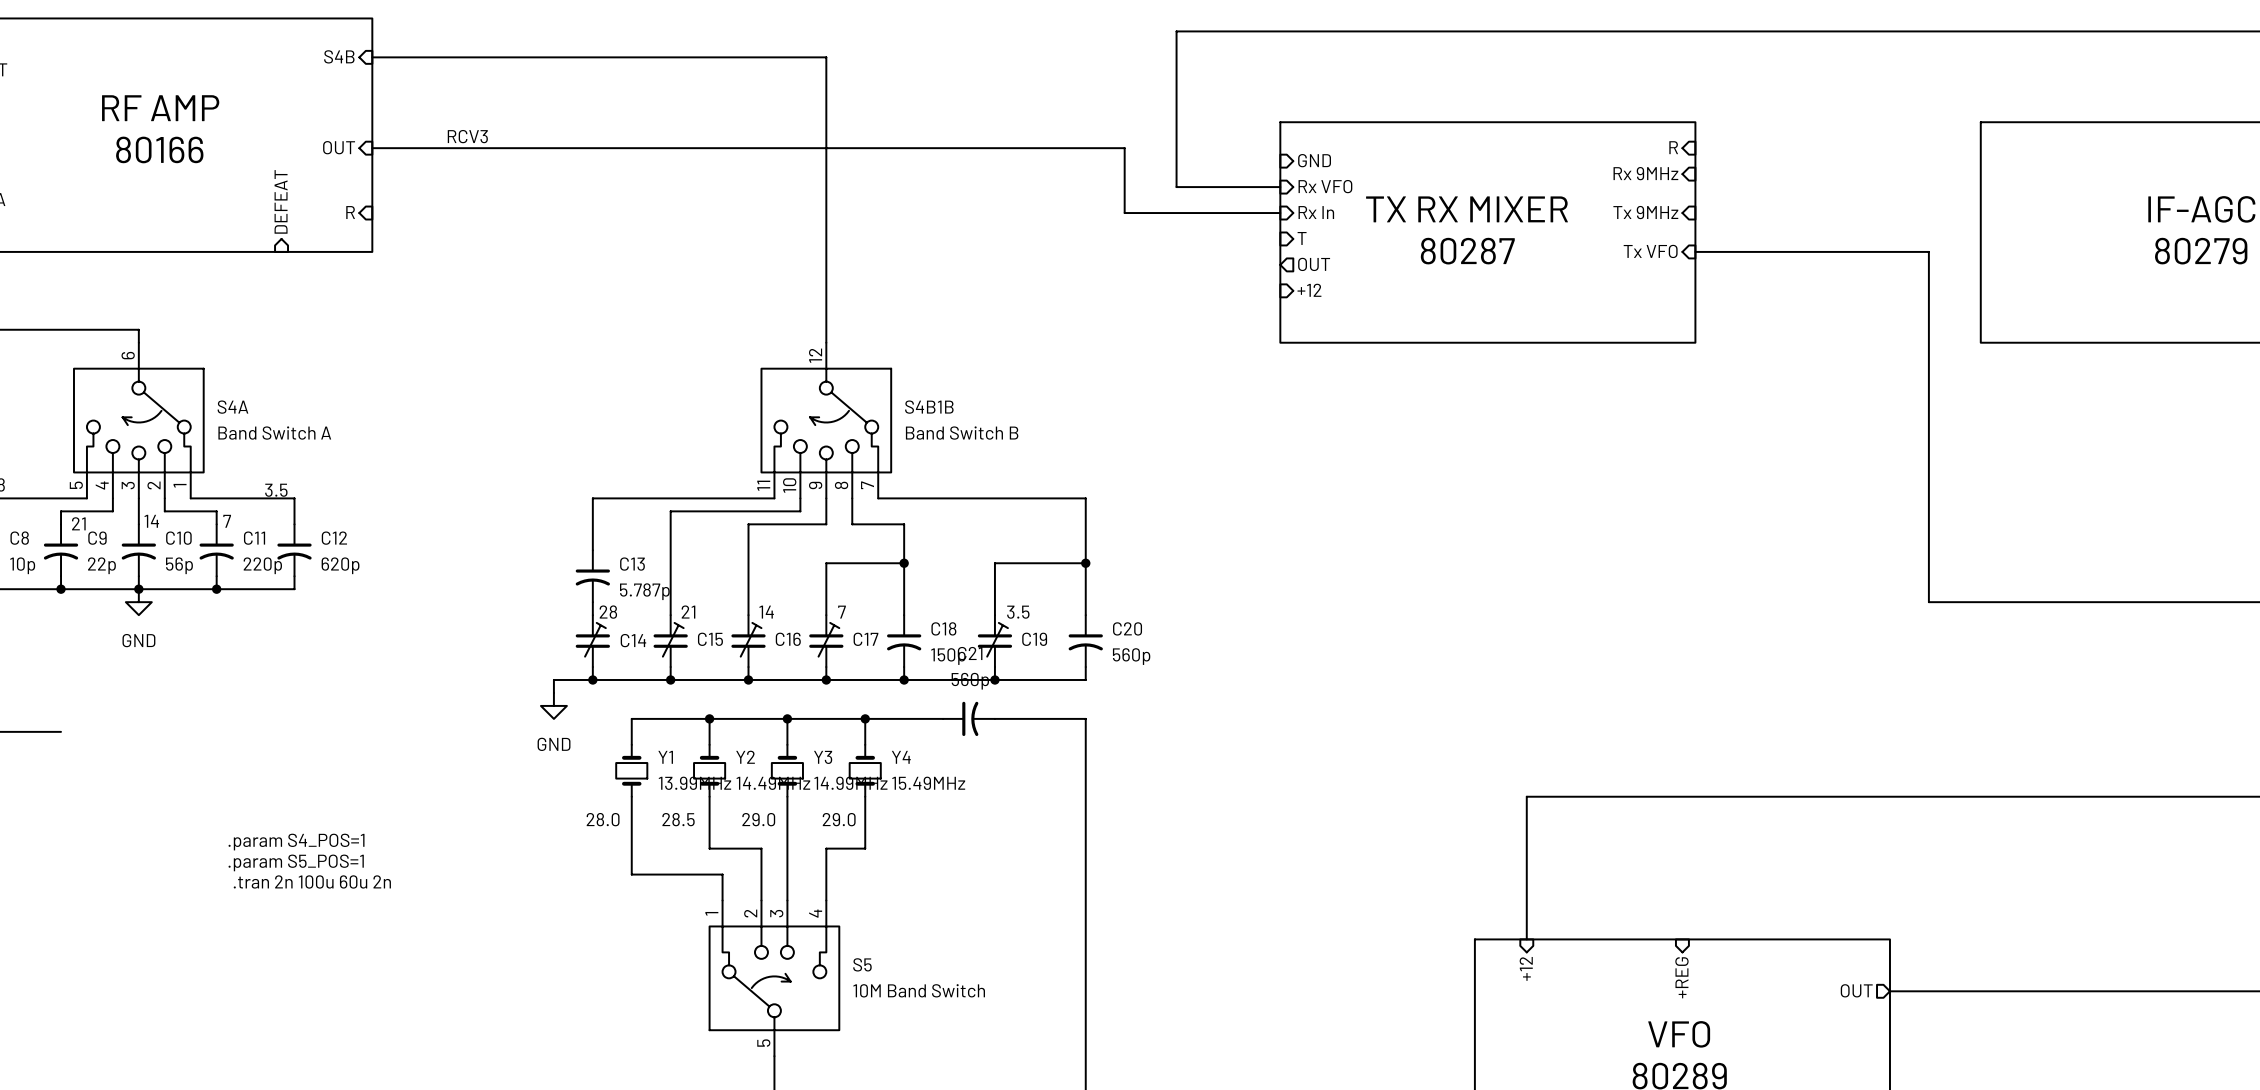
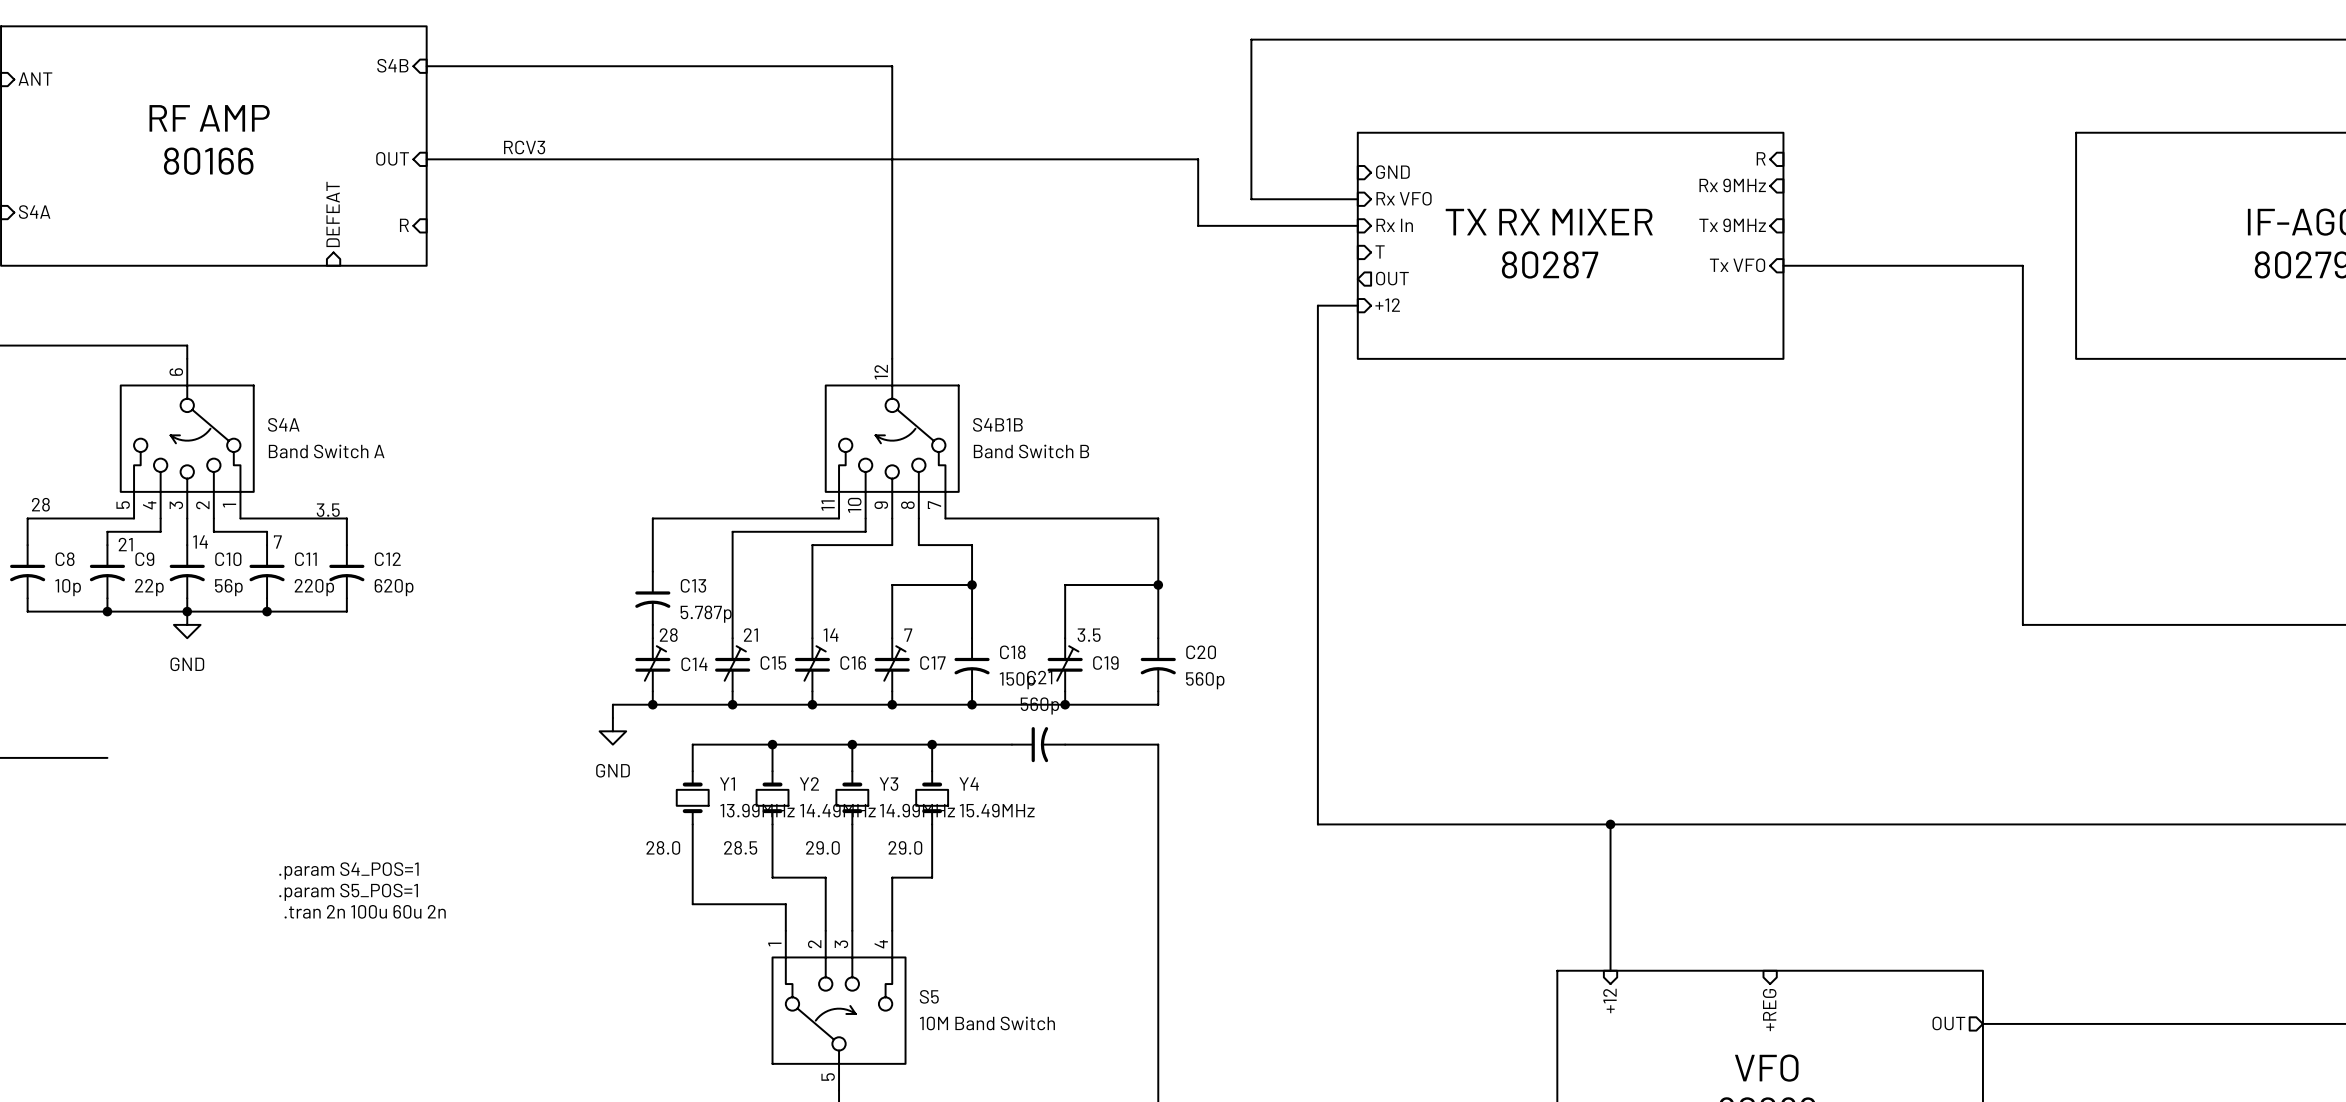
wire: none -> (1357, 305) (1317, 305) (1317, 824) (1610, 824)
junction: none -> (1610, 824)

